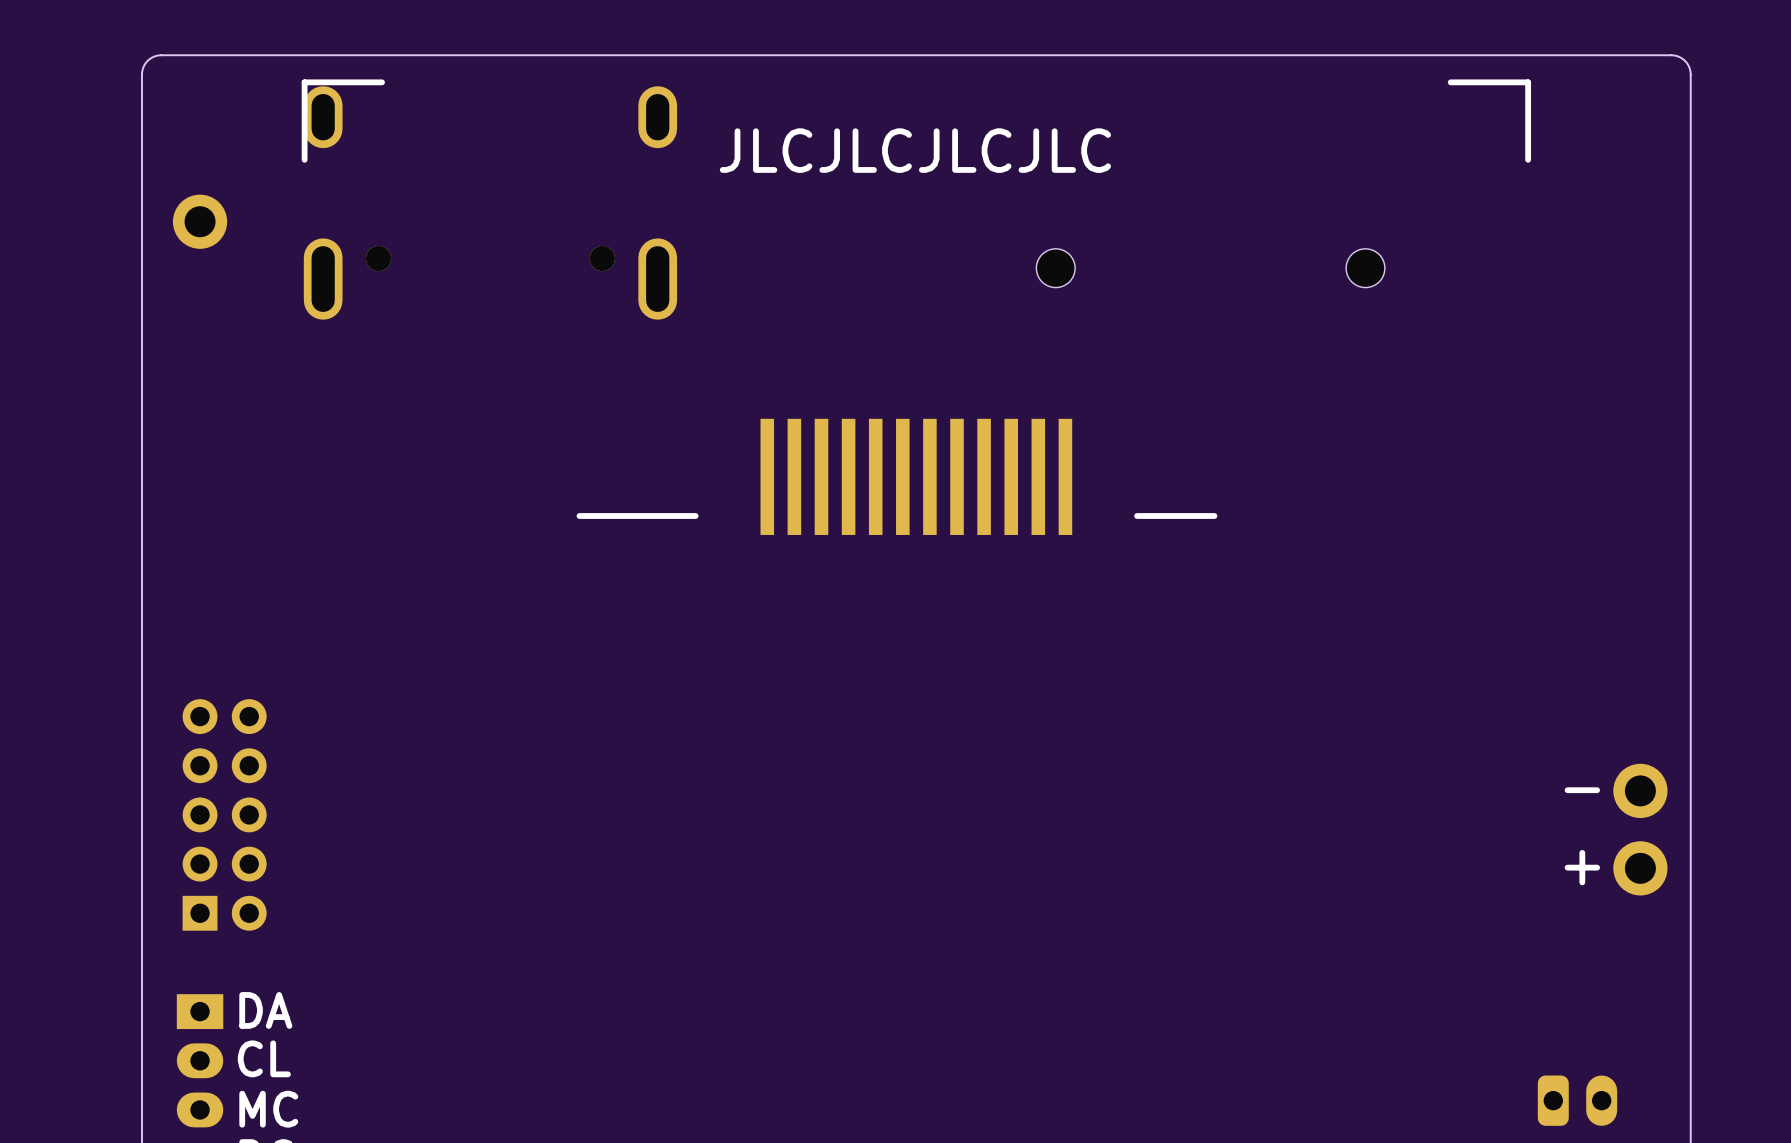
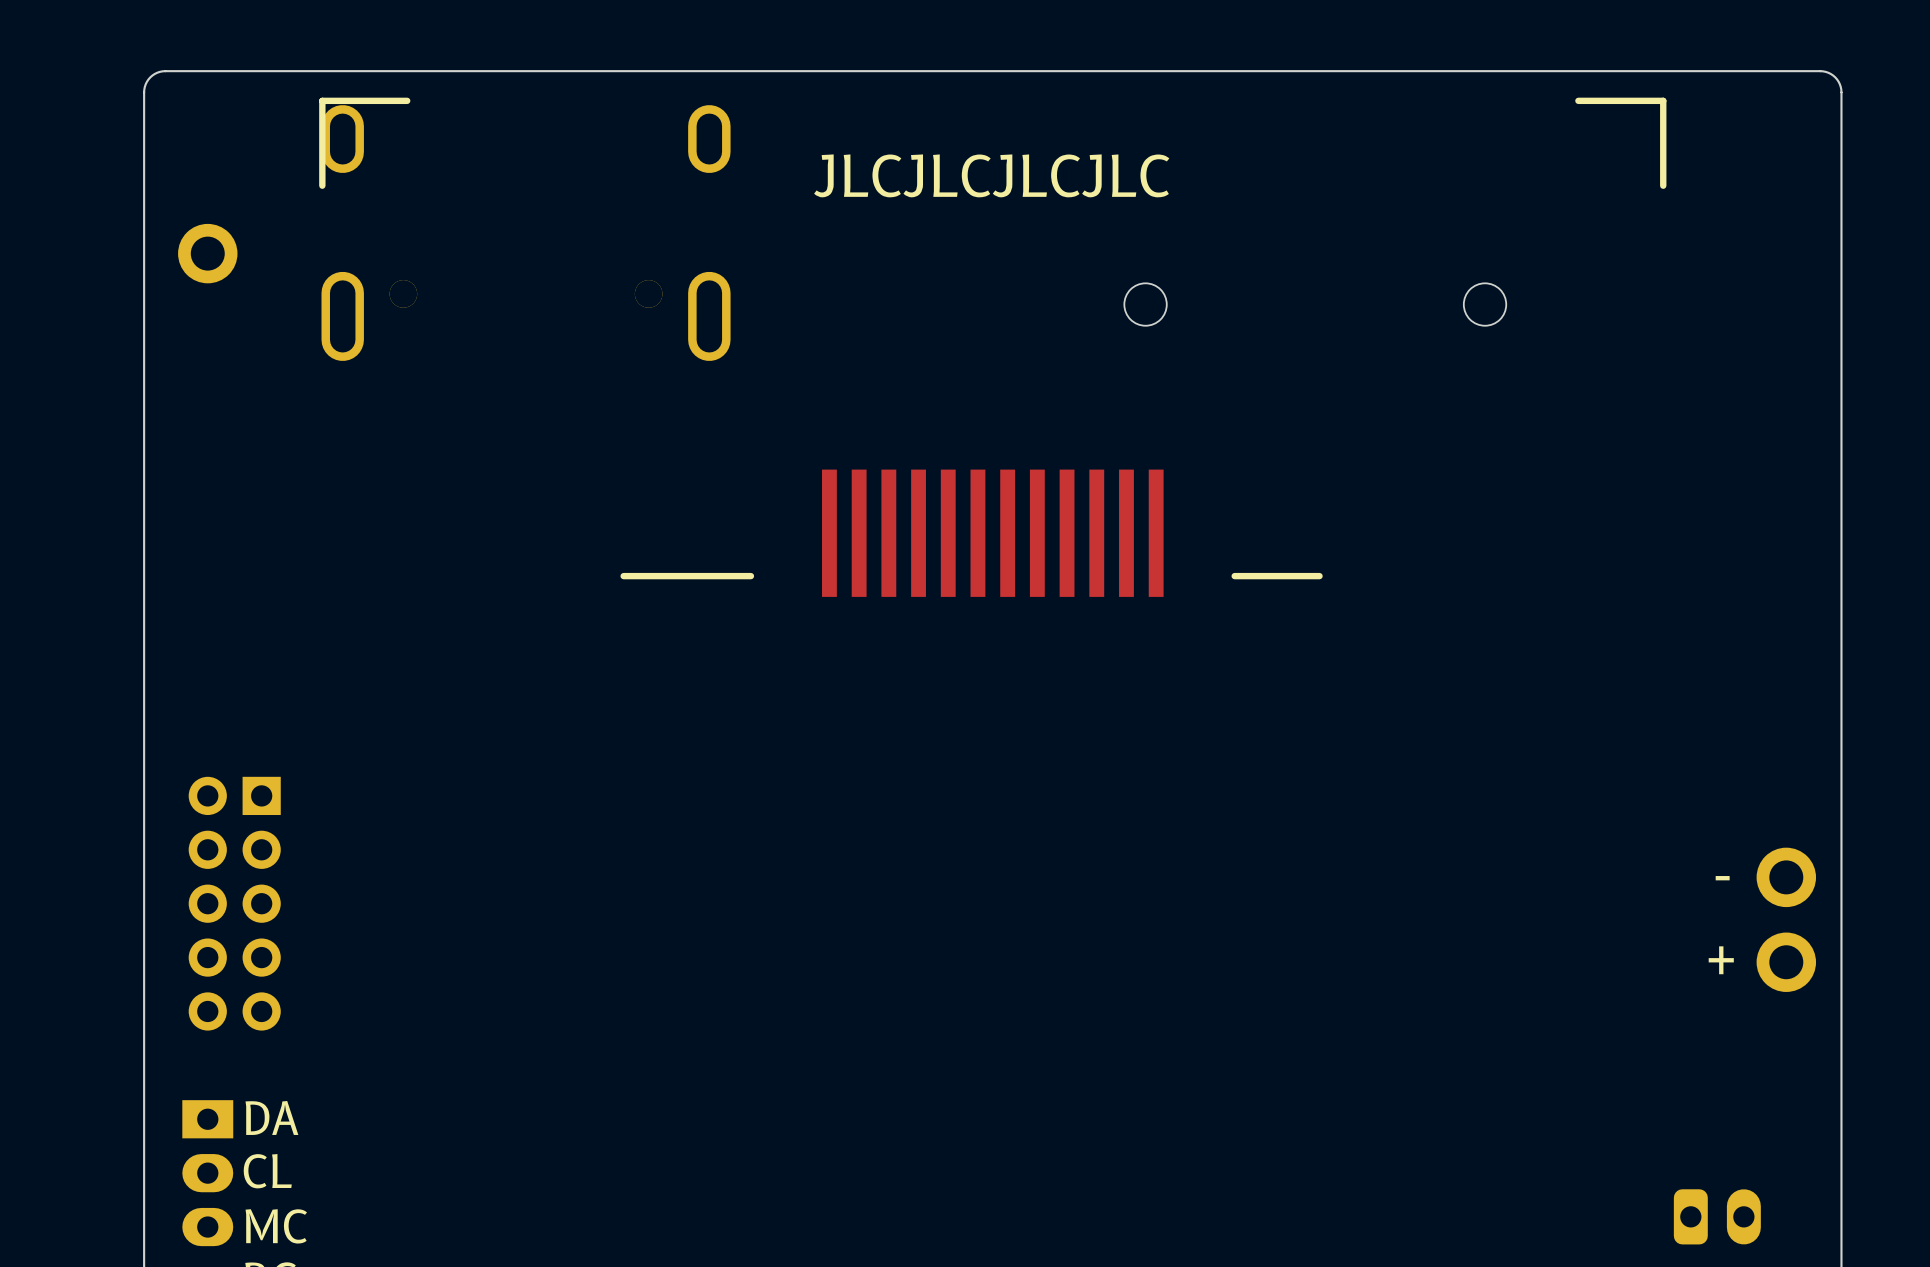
part rotation: 0° (224, 814) -> 180° (234, 903)

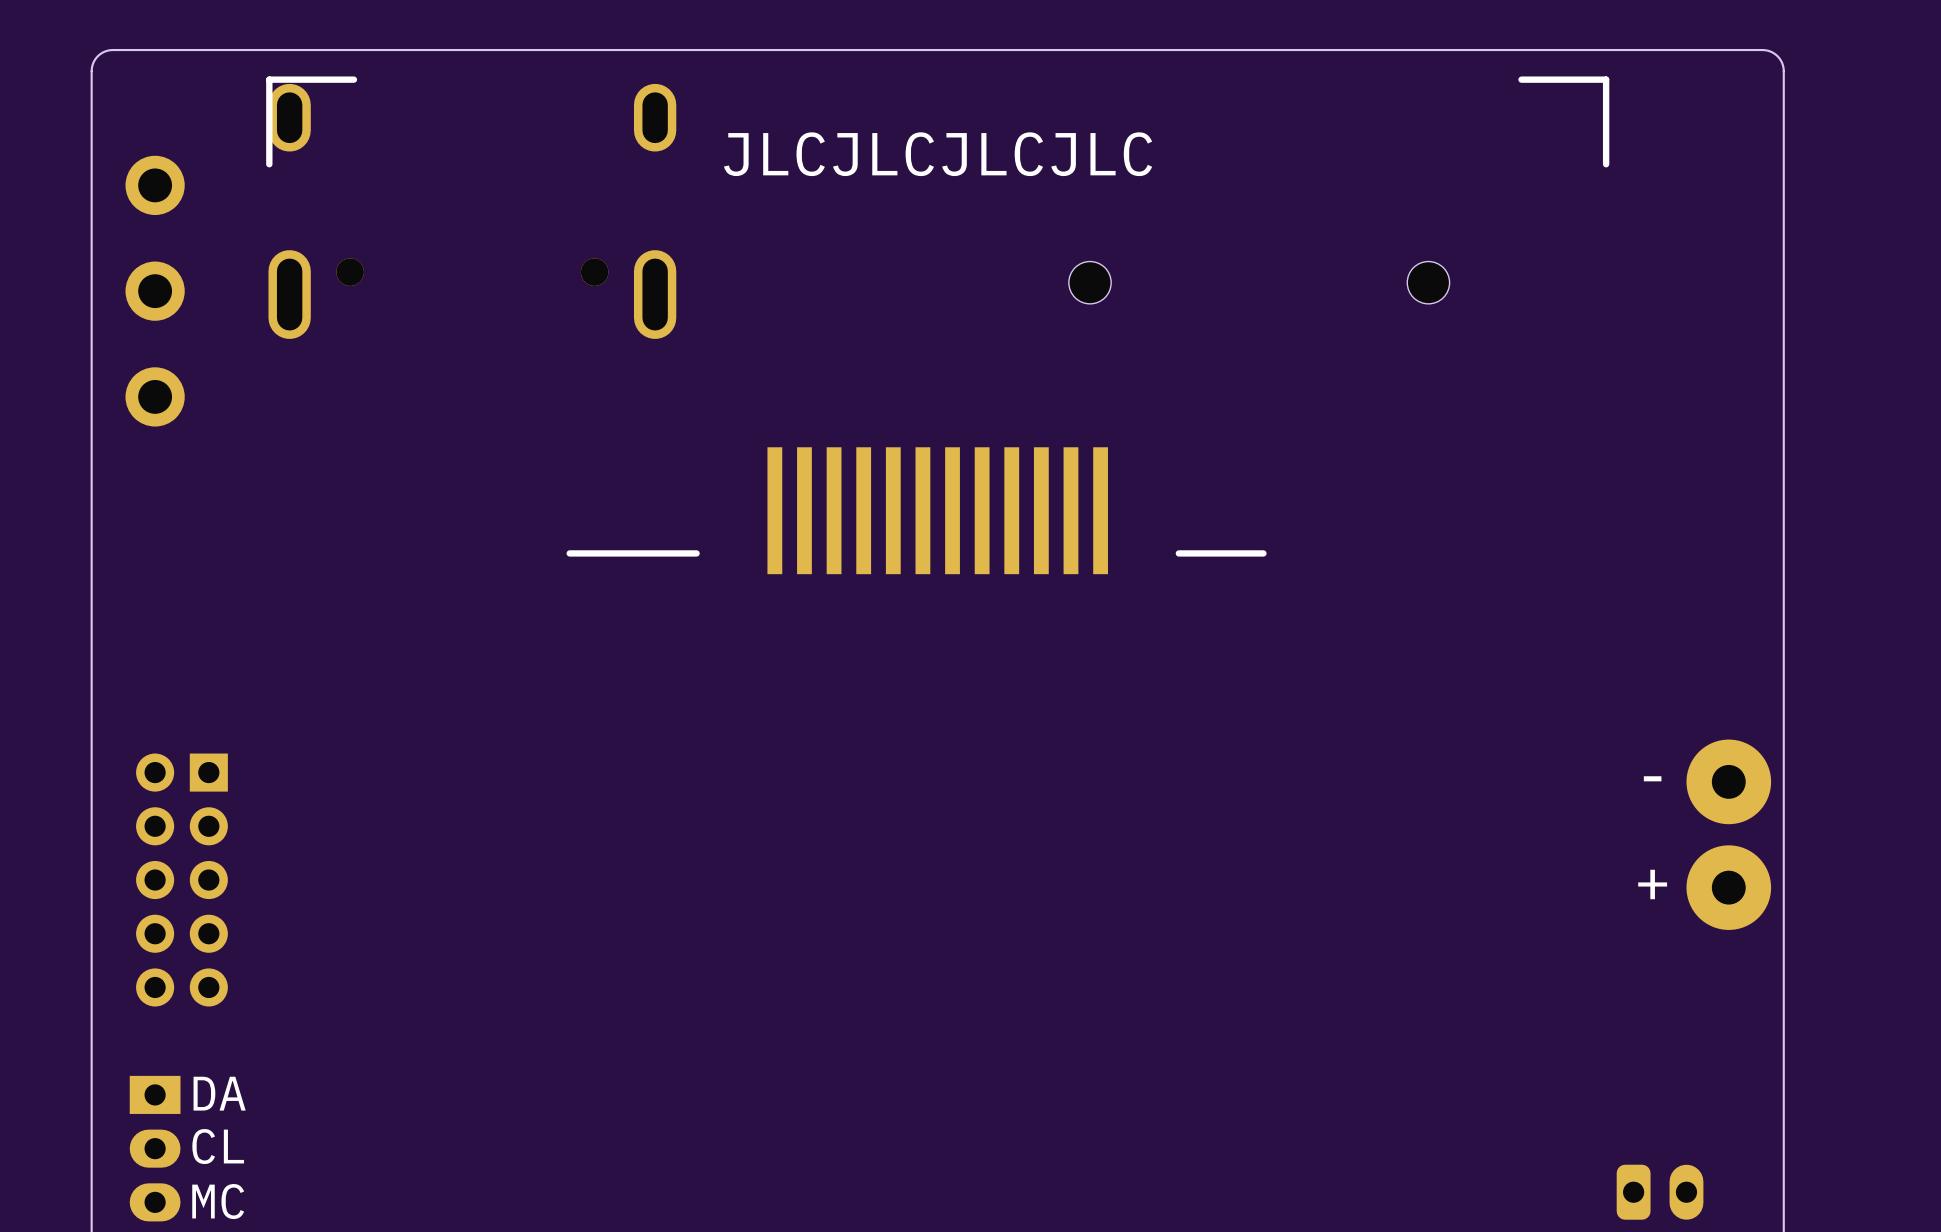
part: none -> (155, 185)
part: (207, 253) -> none
part: none -> (155, 291)
part: none -> (155, 396)
part: none -> (1728, 781)
part: (1786, 877) -> none
text position: - (1722, 878) -> - (1652, 778)
part: none -> (1728, 887)
text position: + (1721, 960) -> + (1652, 884)
part: (1786, 962) -> none

